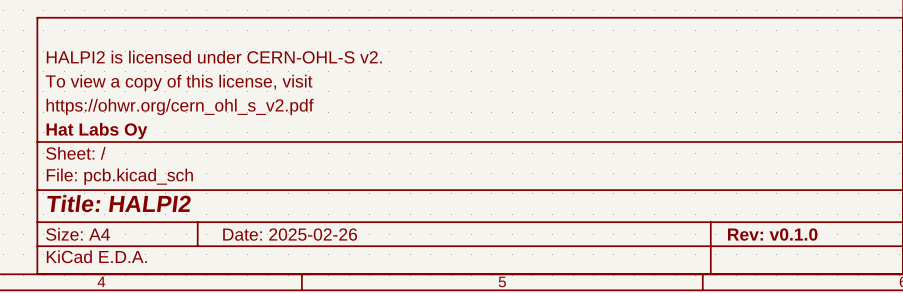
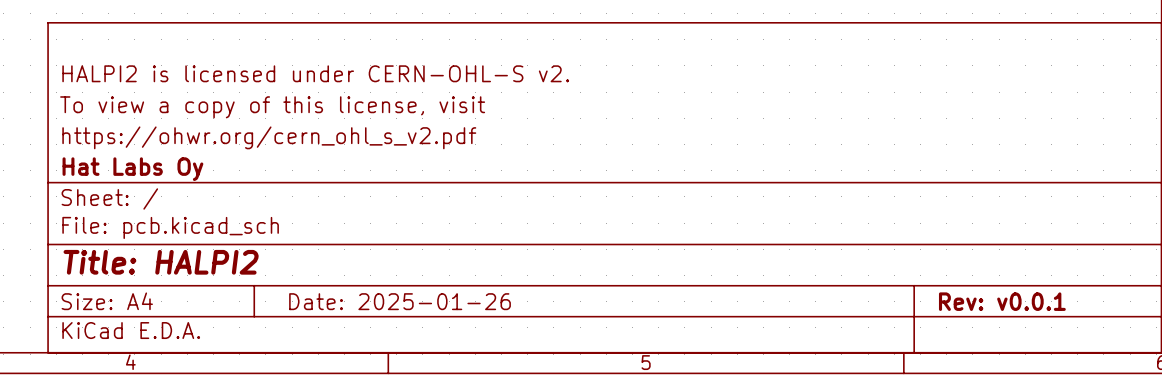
title block: Date: 2025-02-26 (290, 234) -> Date: 2025-01-26 (400, 301)
title block: Rev: v0.1.0 (772, 234) -> Rev: v0.0.1 (1002, 301)

